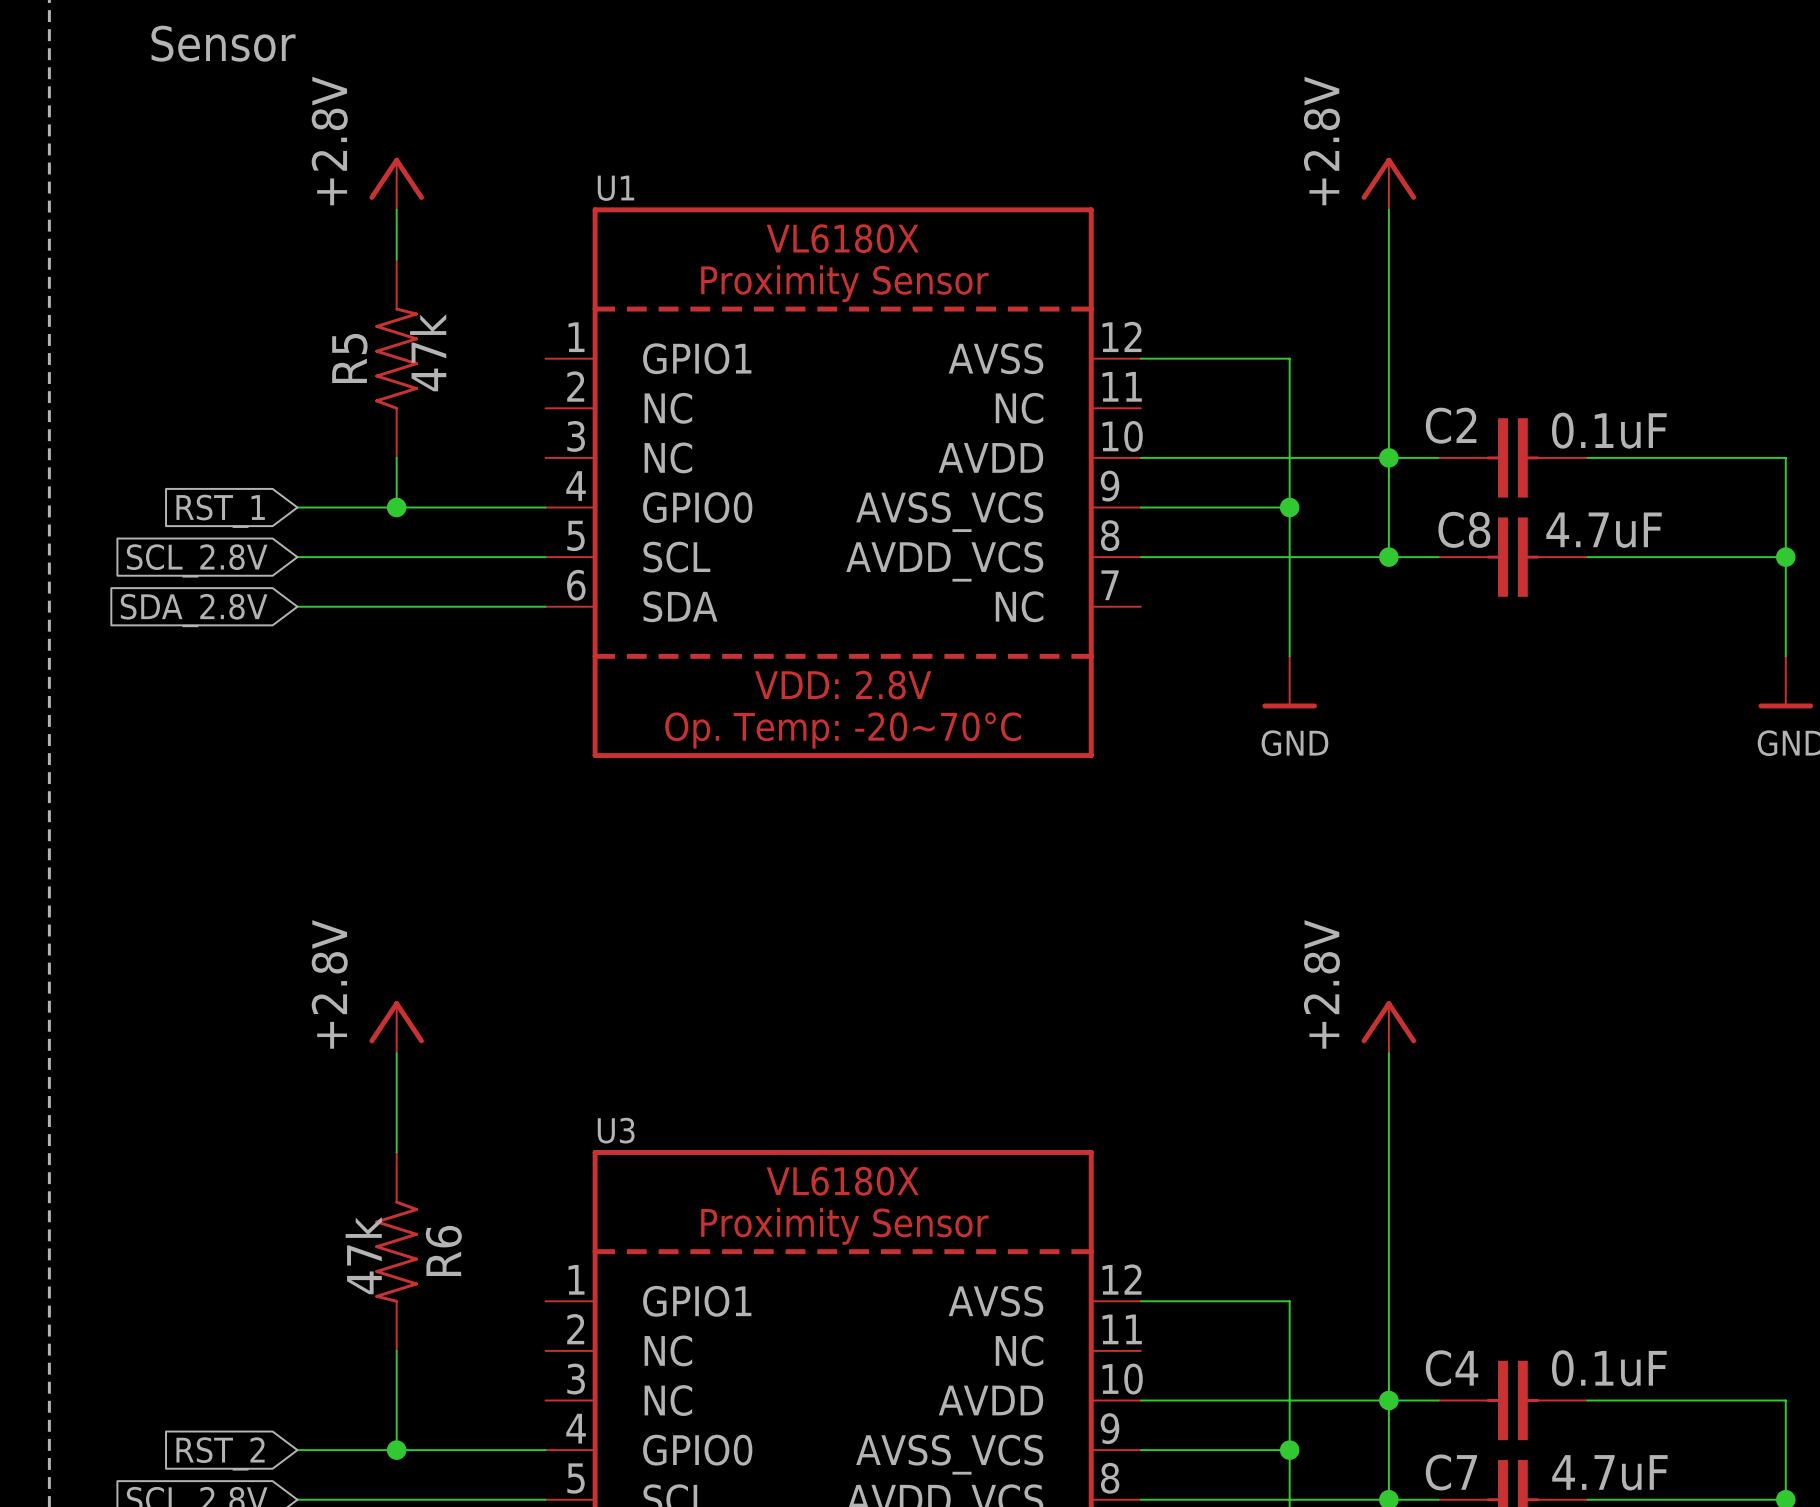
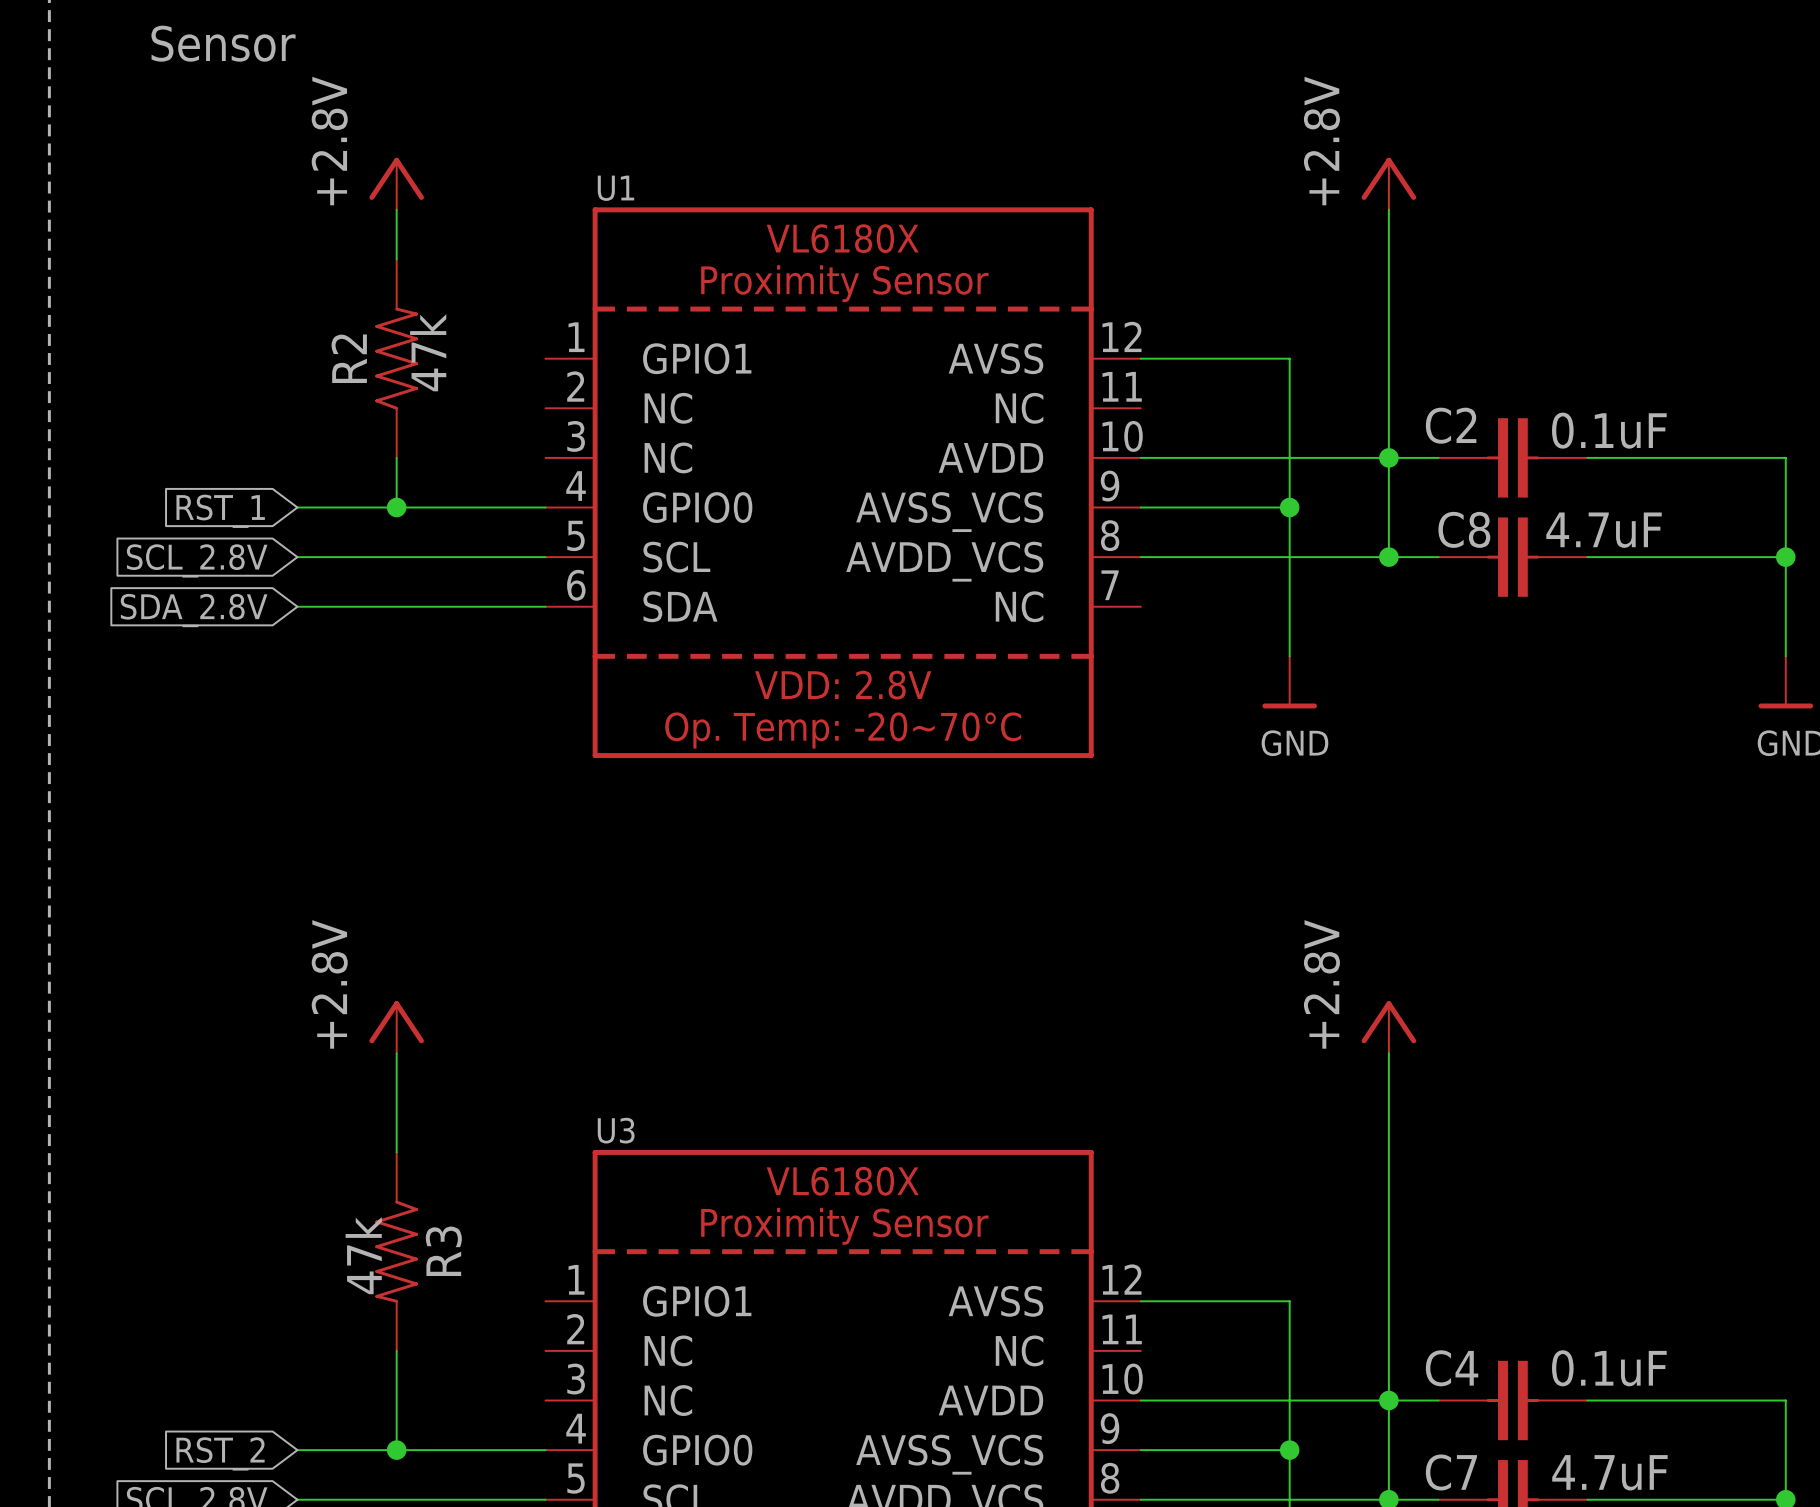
R5 name: R5 (349, 358) -> R2 (349, 358)
R6 name: R6 (443, 1250) -> R3 (443, 1251)

